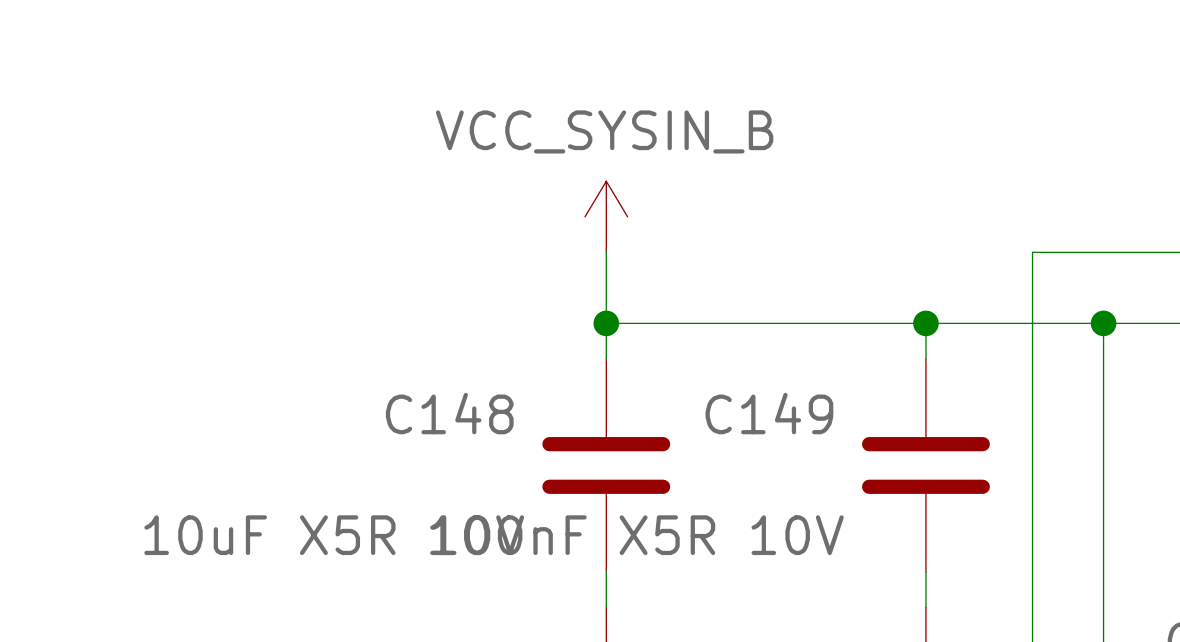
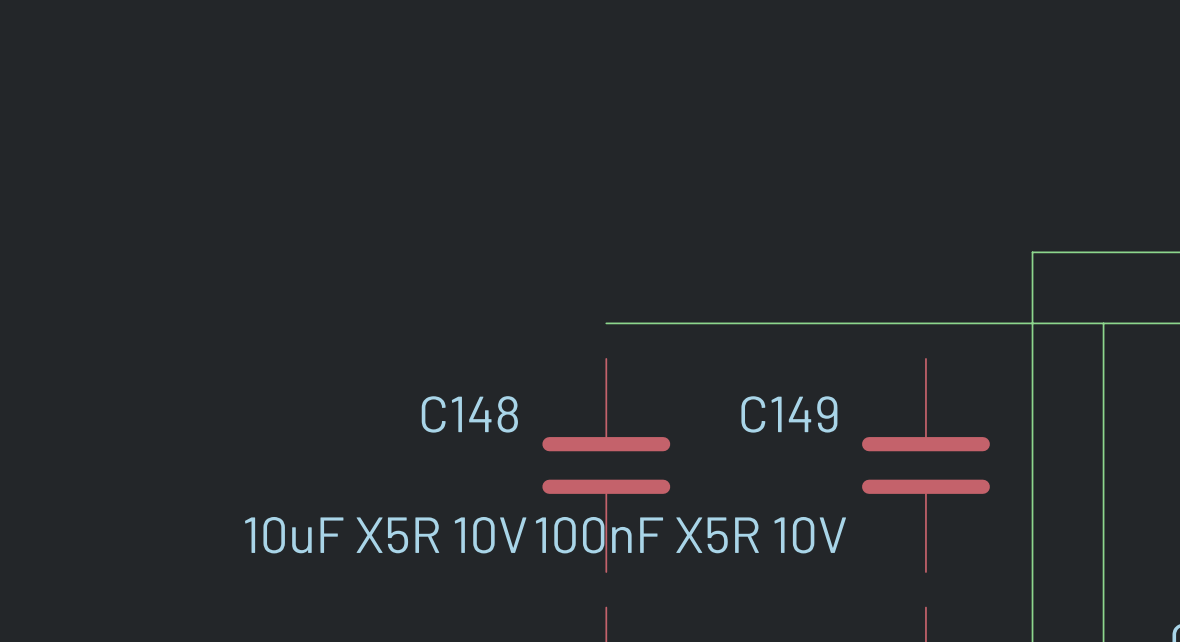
power symbol: VCC_SYSIN_B (606, 216) -> none
wire: (606, 252) (606, 358) -> none
junction: (606, 323) -> none
wire: (925, 323) (925, 358) -> none
junction: (925, 323) -> none
junction: (1103, 323) -> none
wire: (606, 572) (606, 607) -> none
wire: (925, 572) (925, 607) -> none

